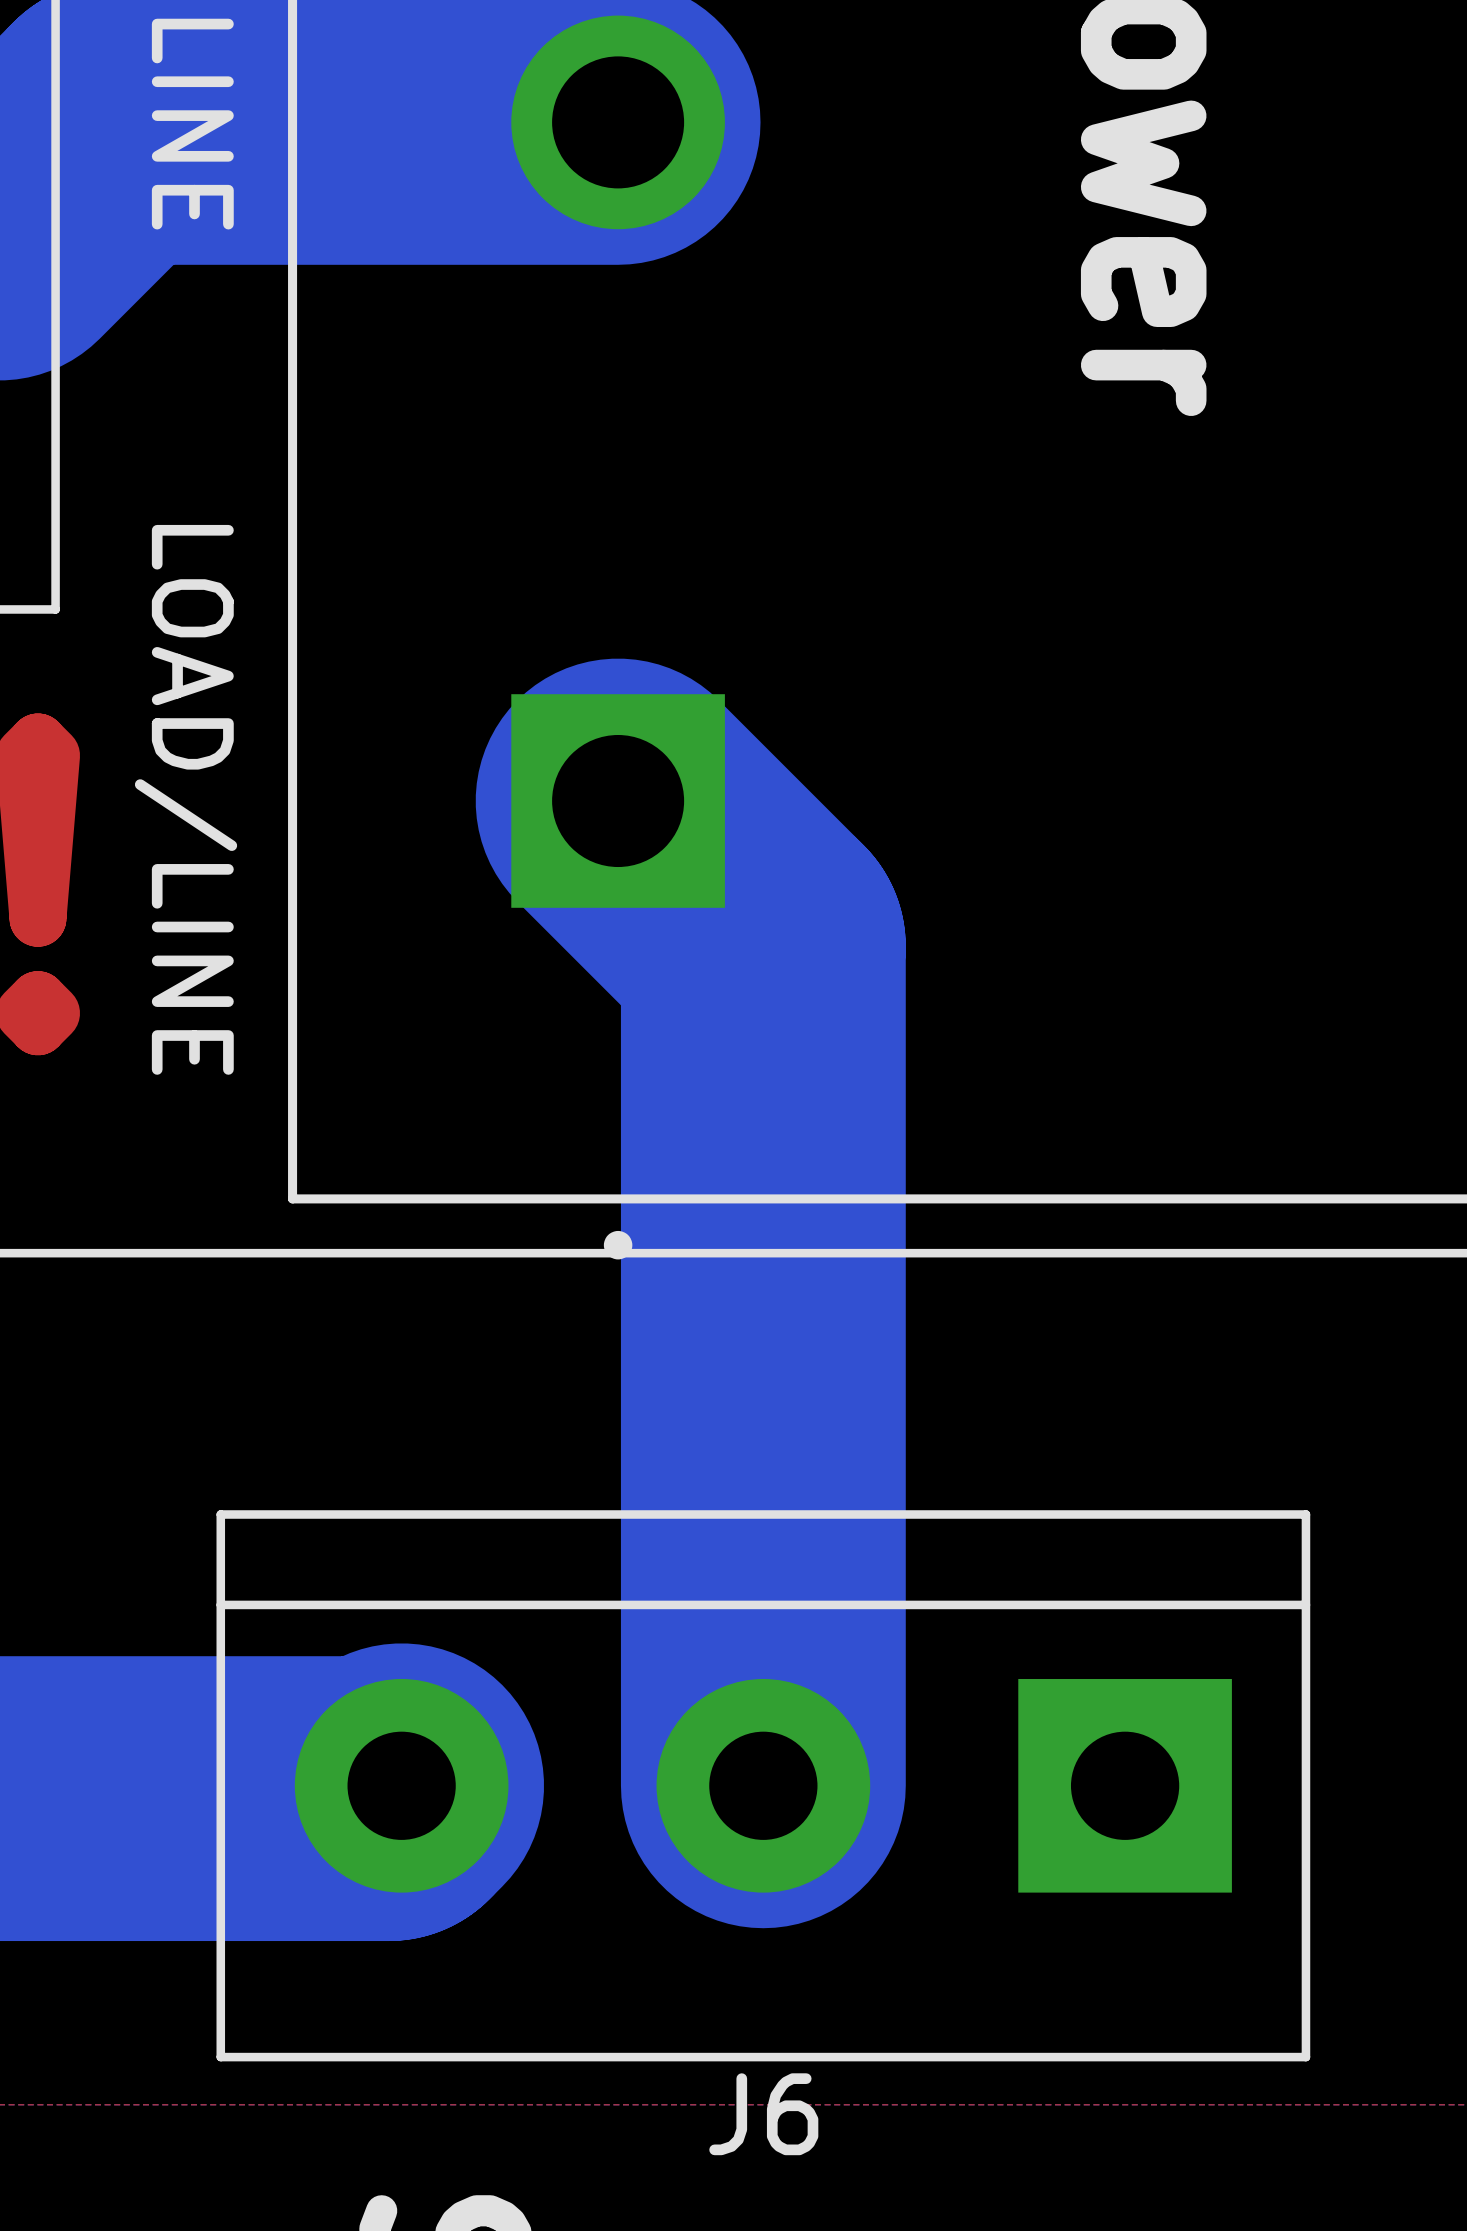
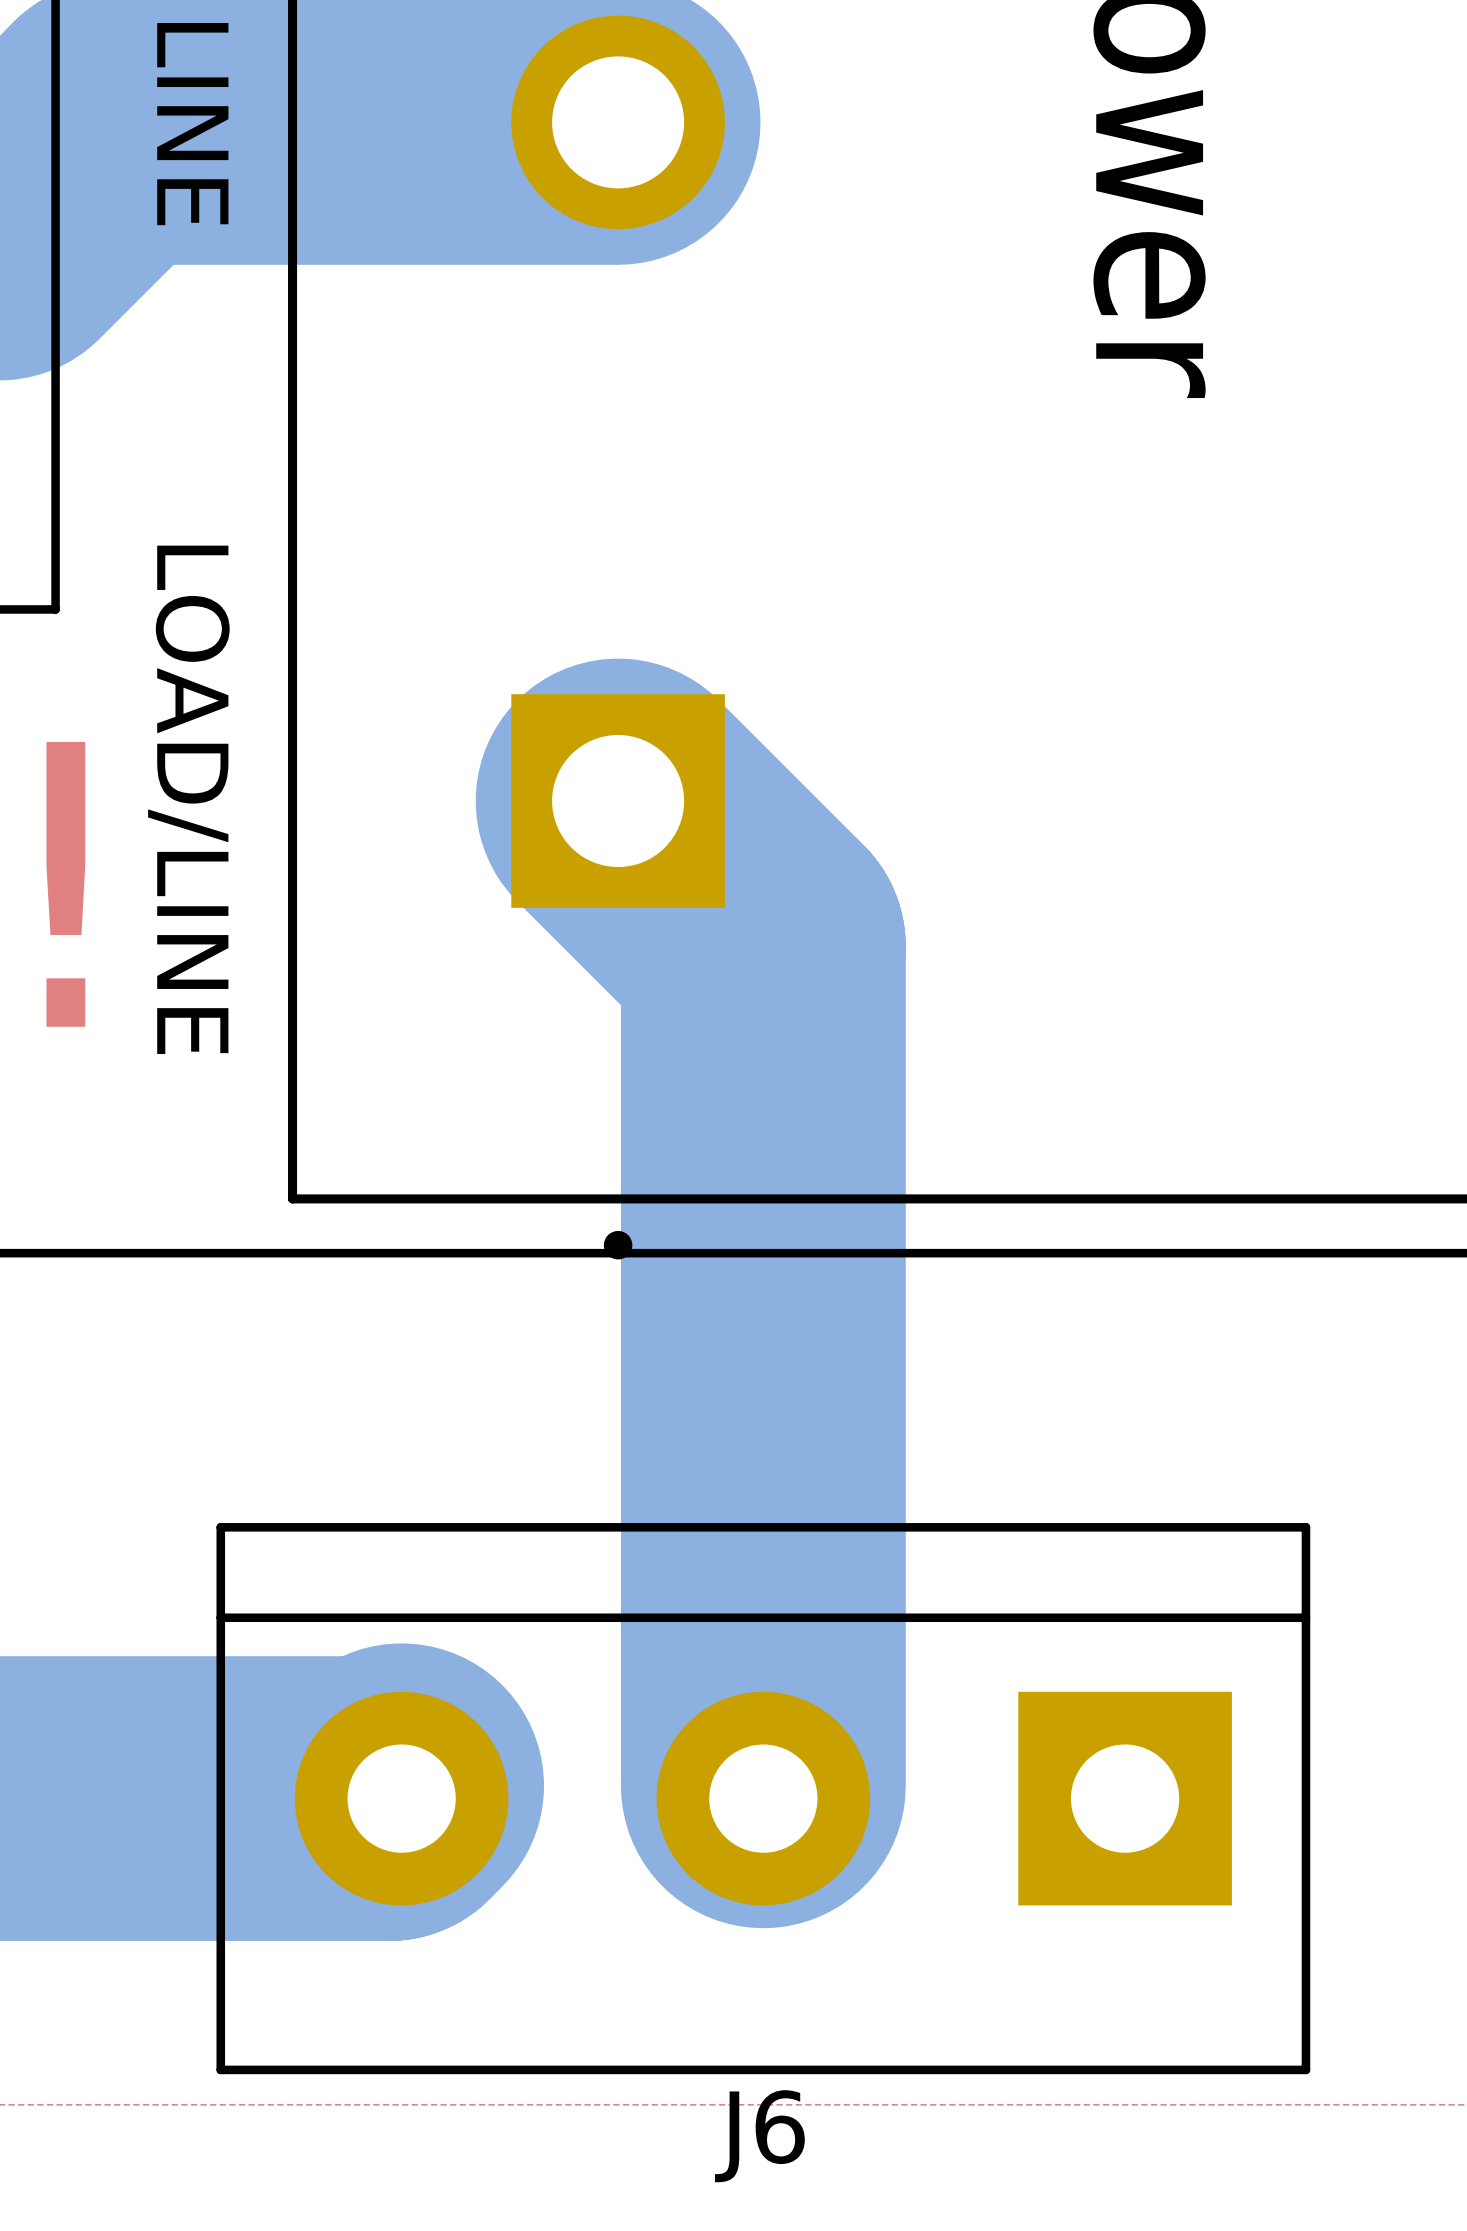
J6 position: (763, 1785) -> (763, 1798)

